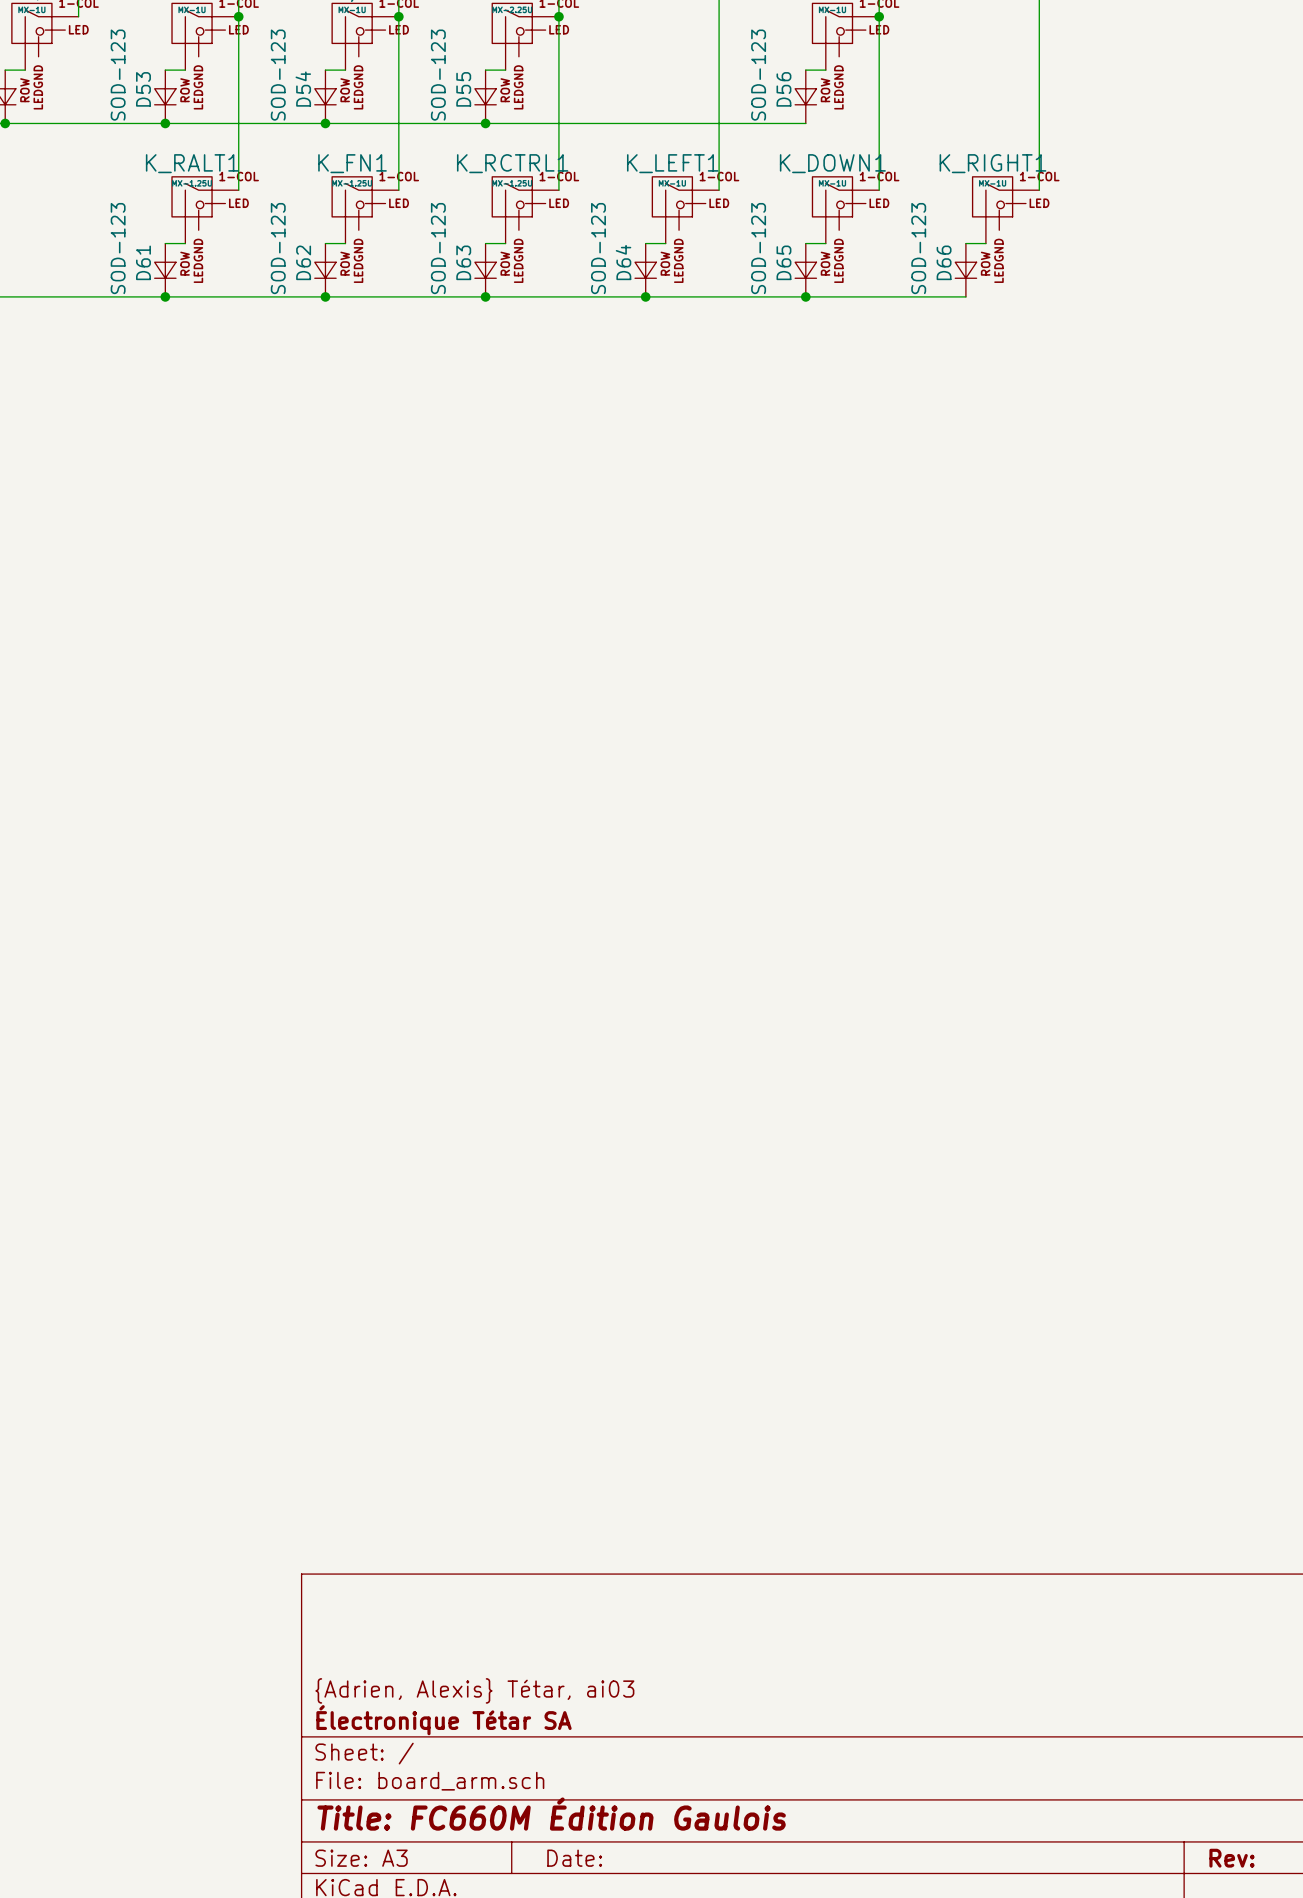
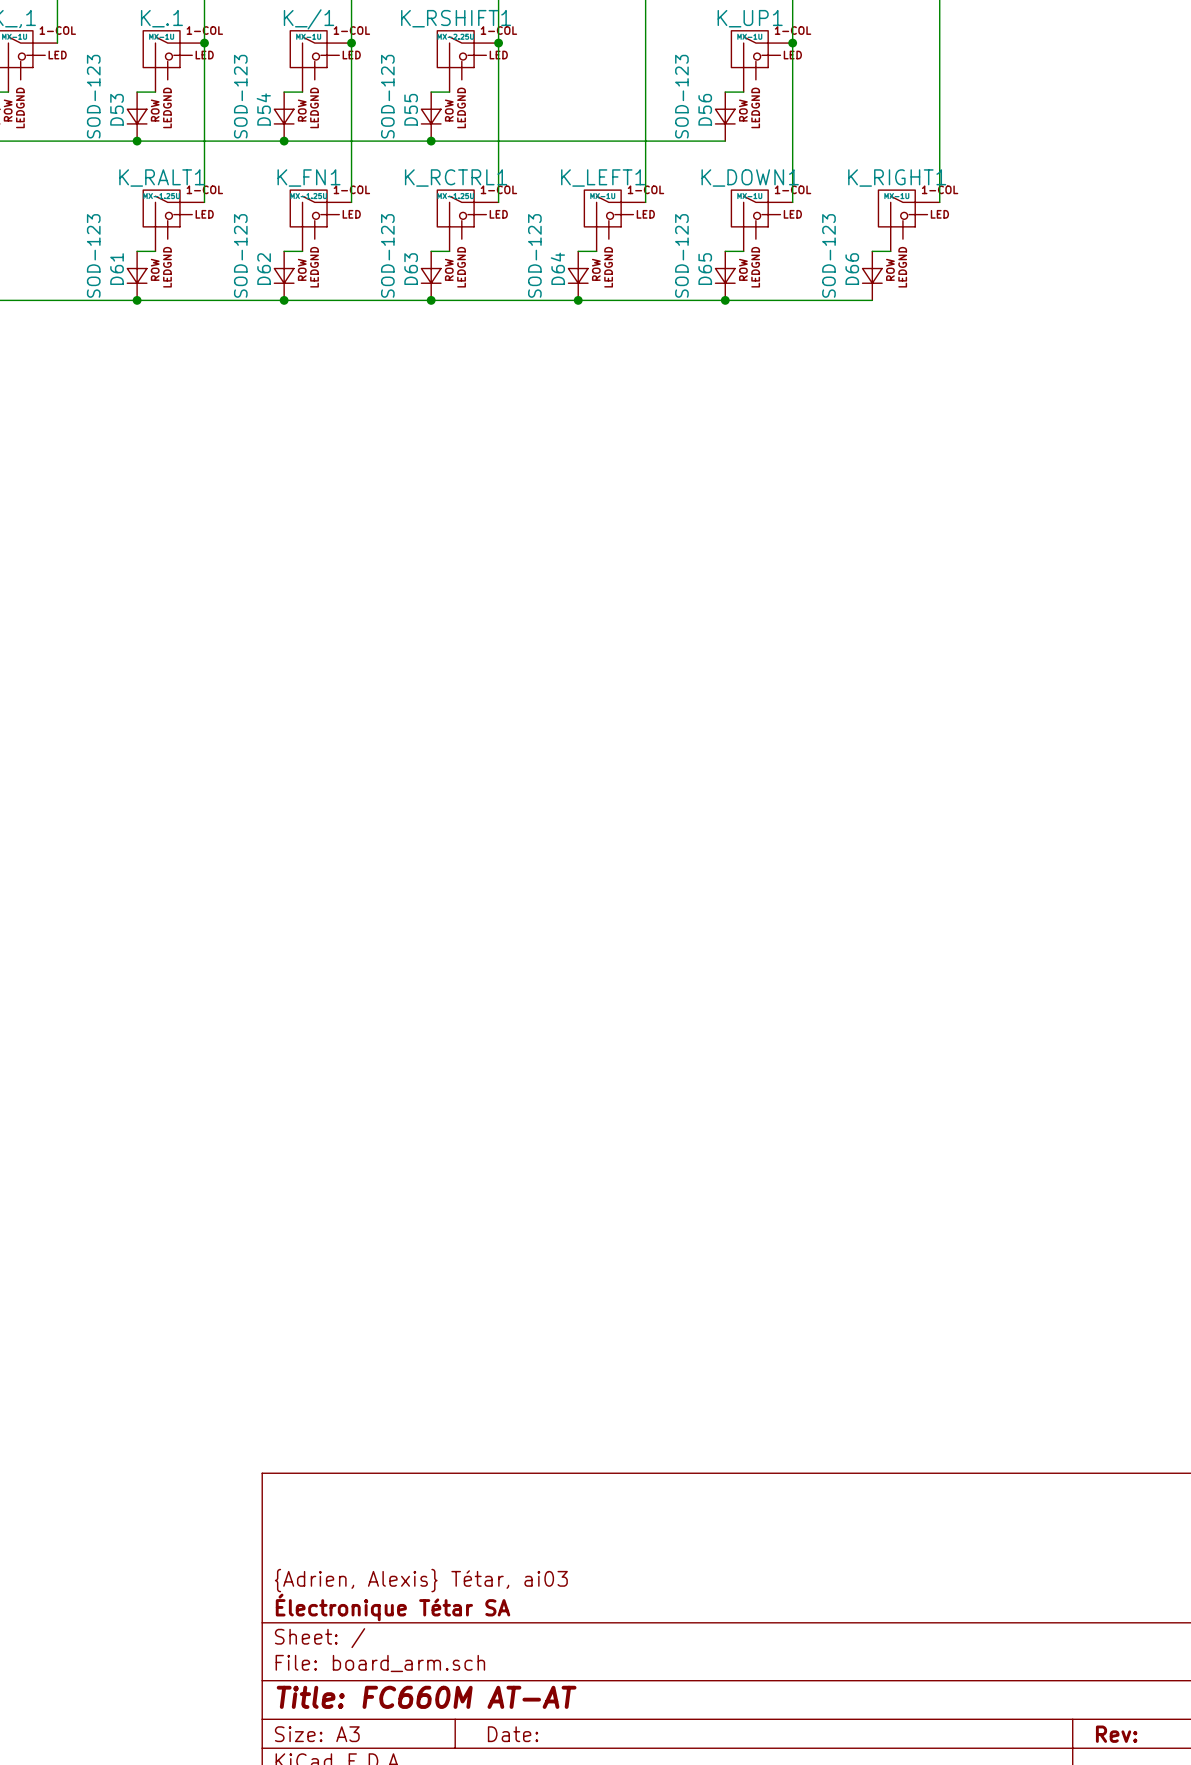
title block: Title: FC660M Édition Gaulois (551, 1814) -> Title: FC660M AT-AT (426, 1697)

